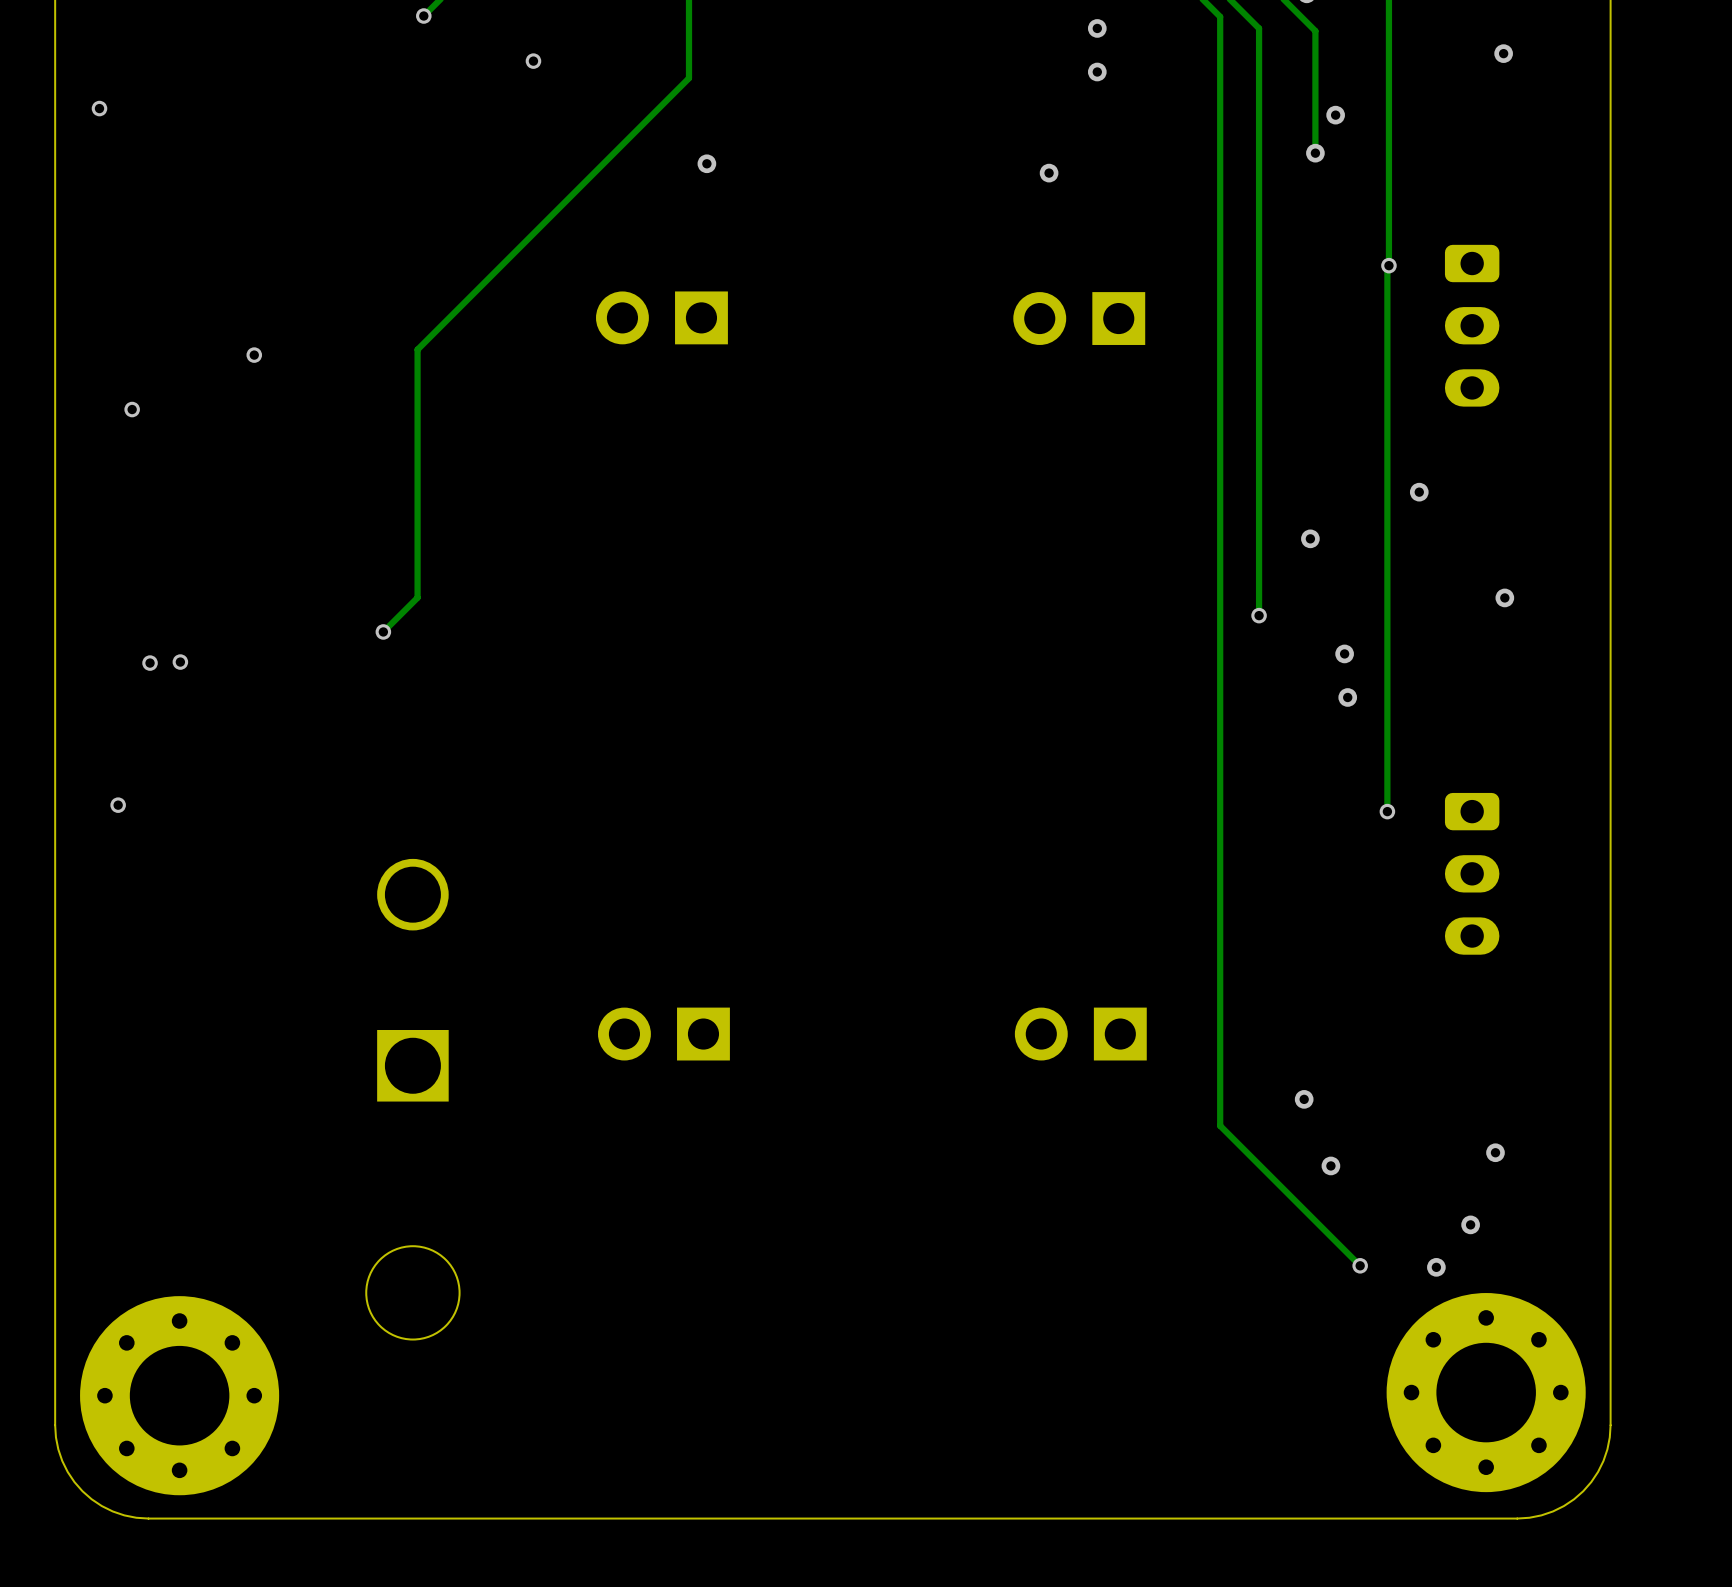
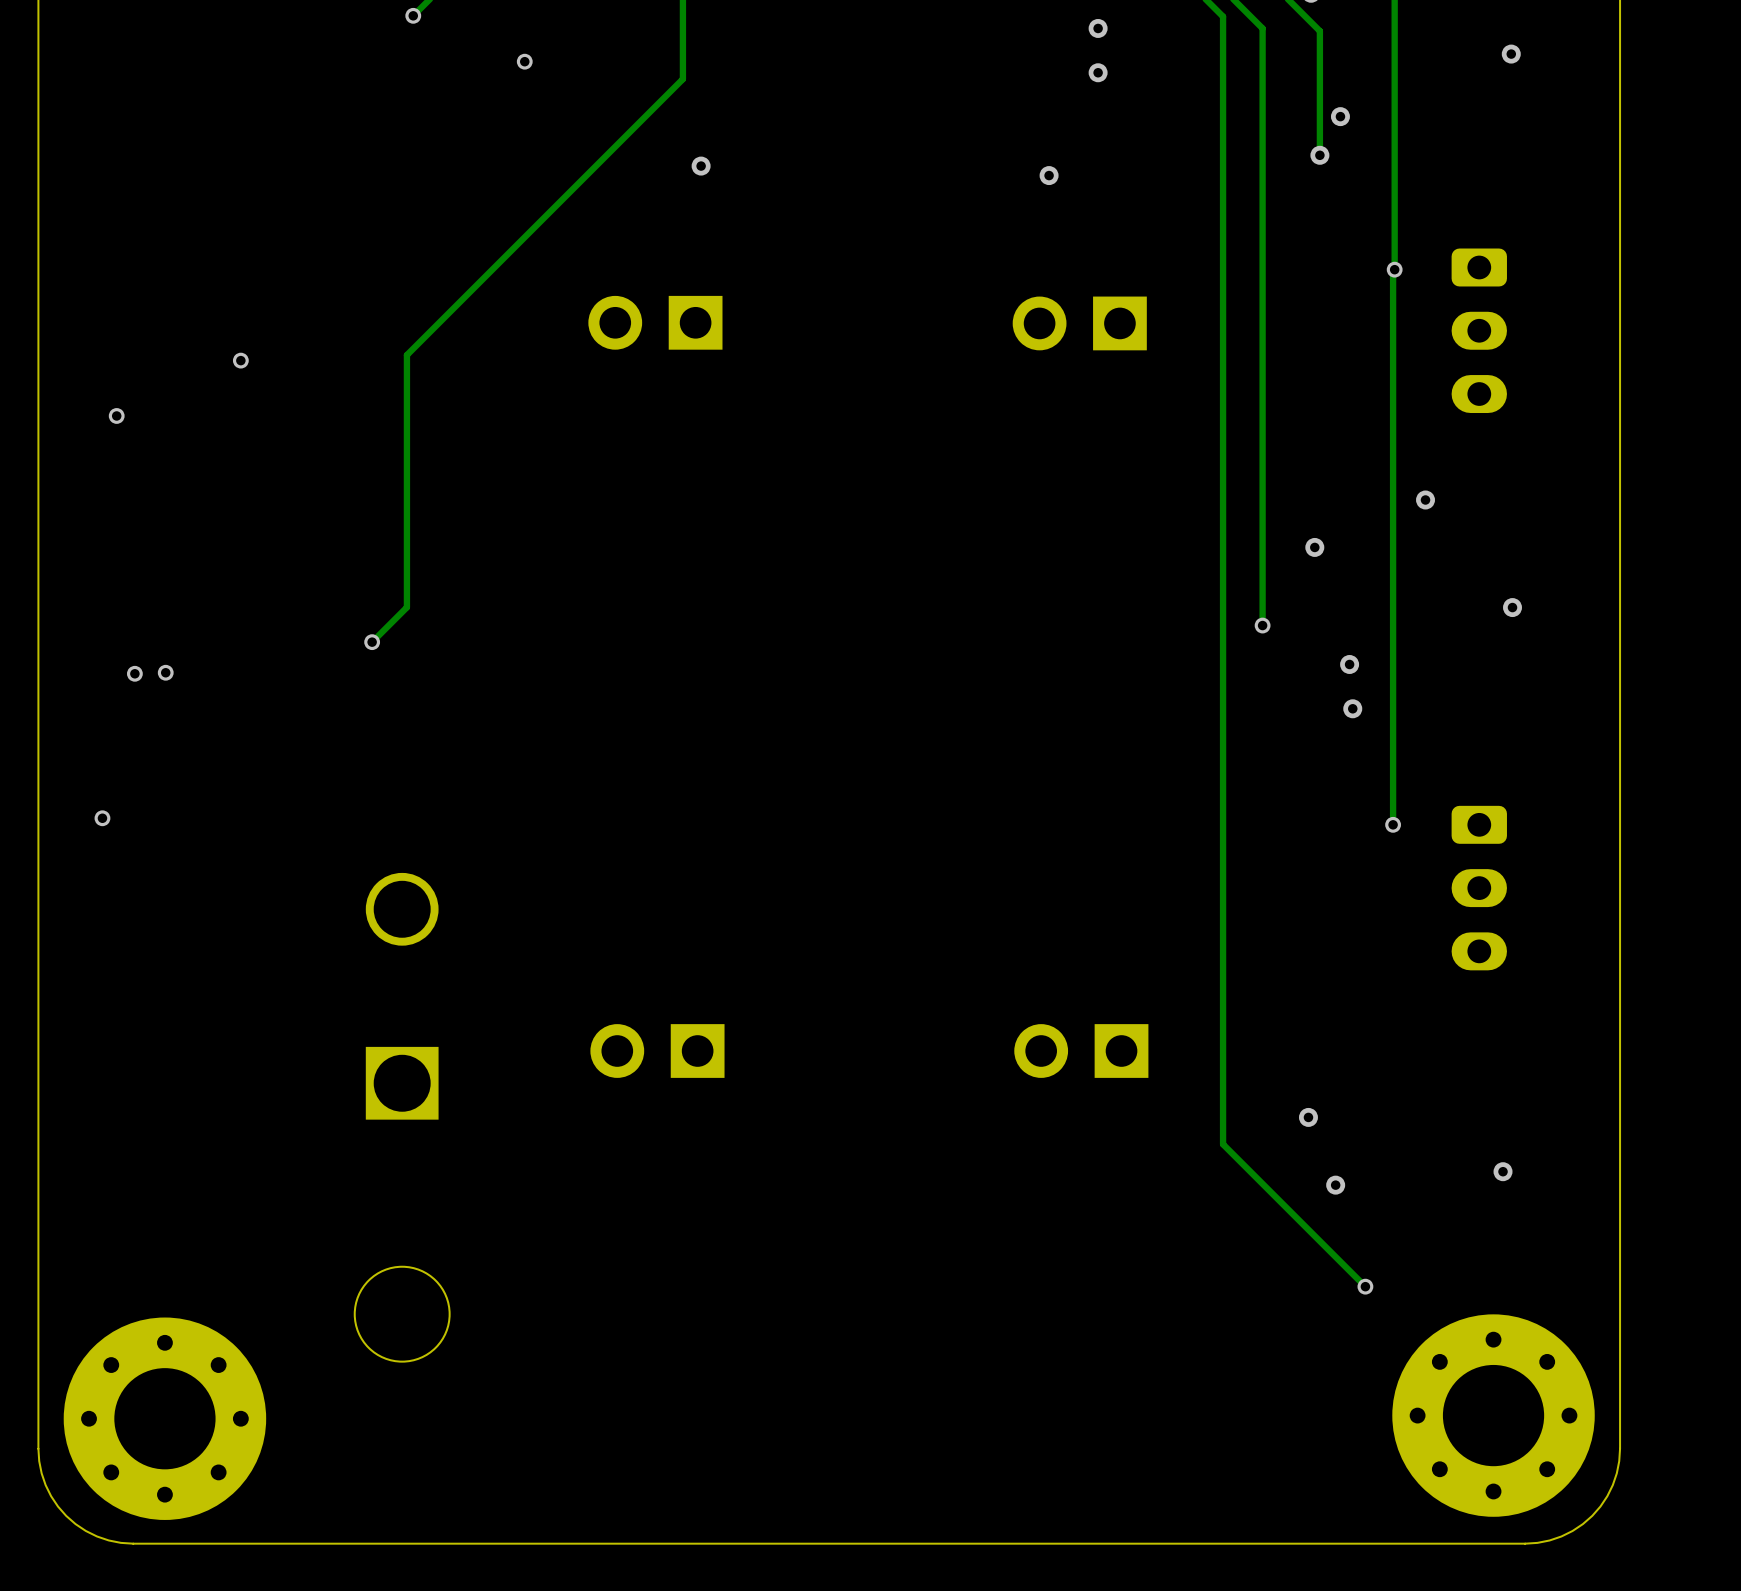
via: (99, 108) -> none
via: (1470, 1224) -> none
via: (1436, 1267) -> none

